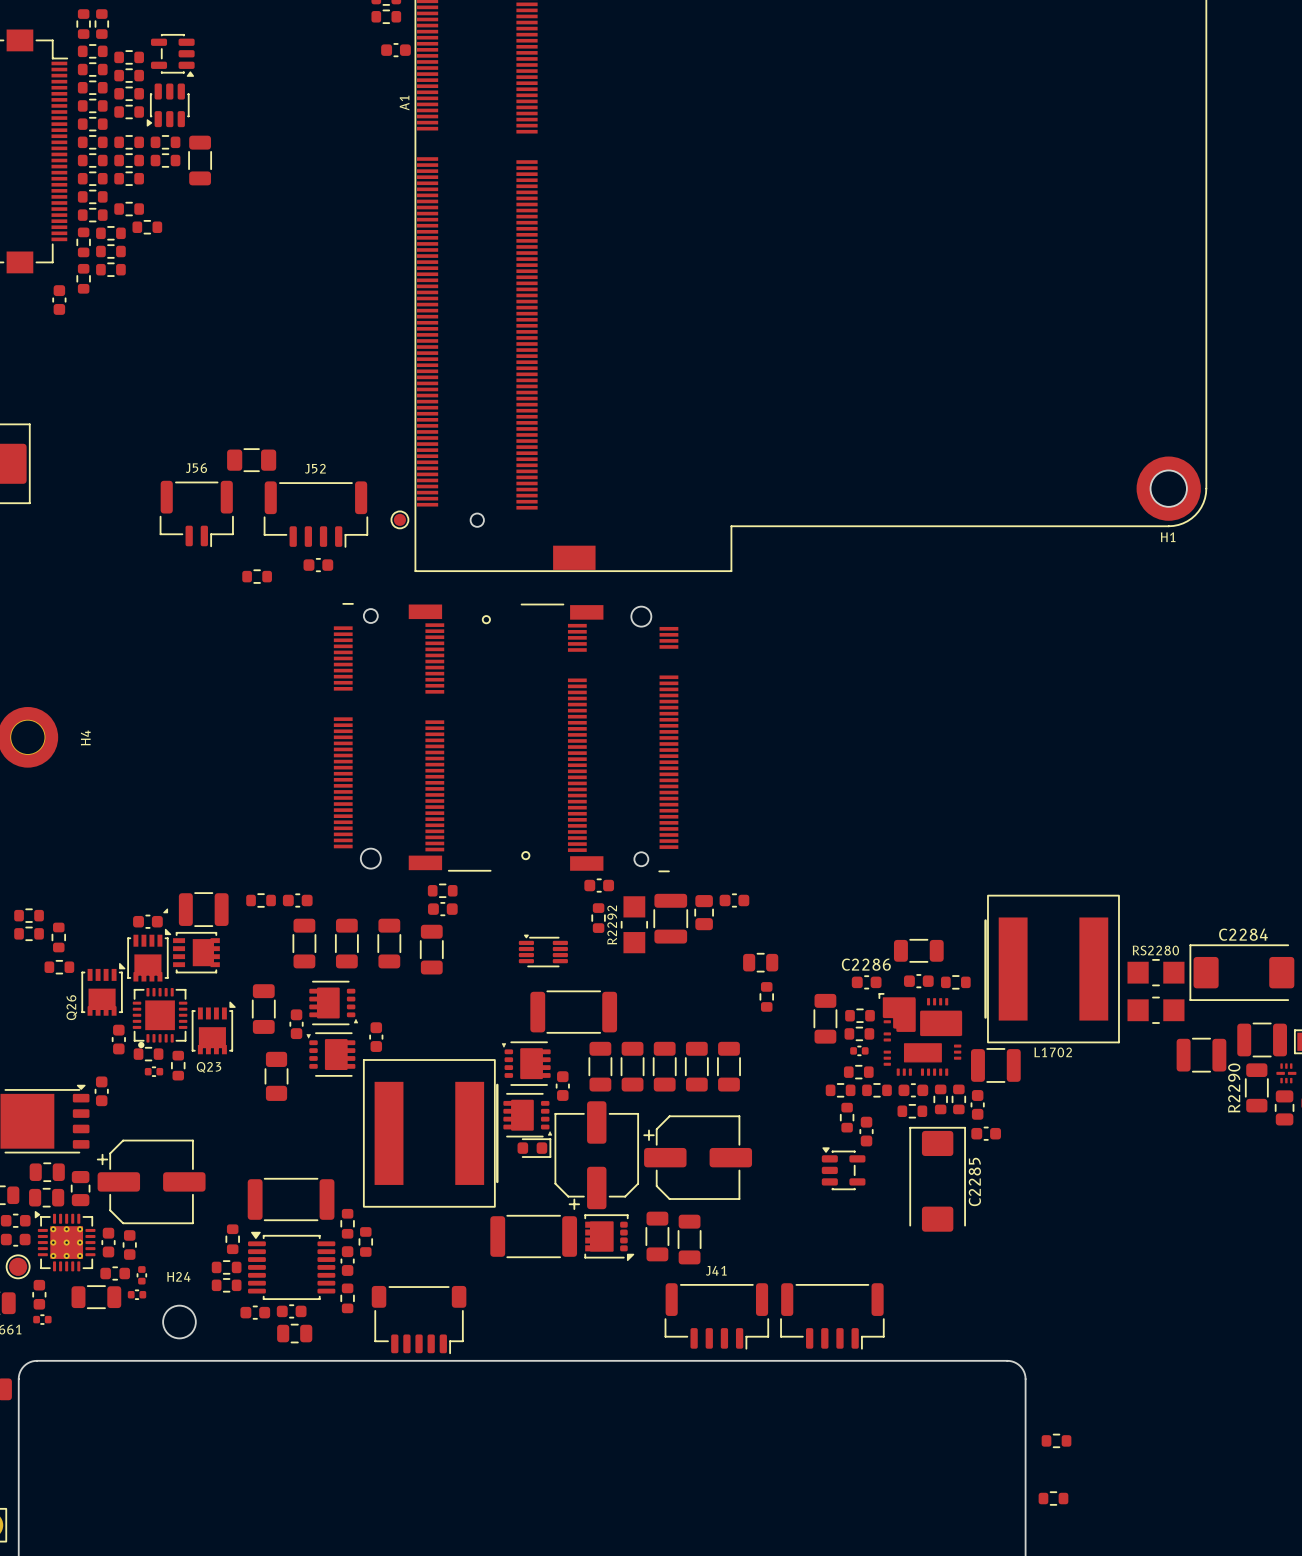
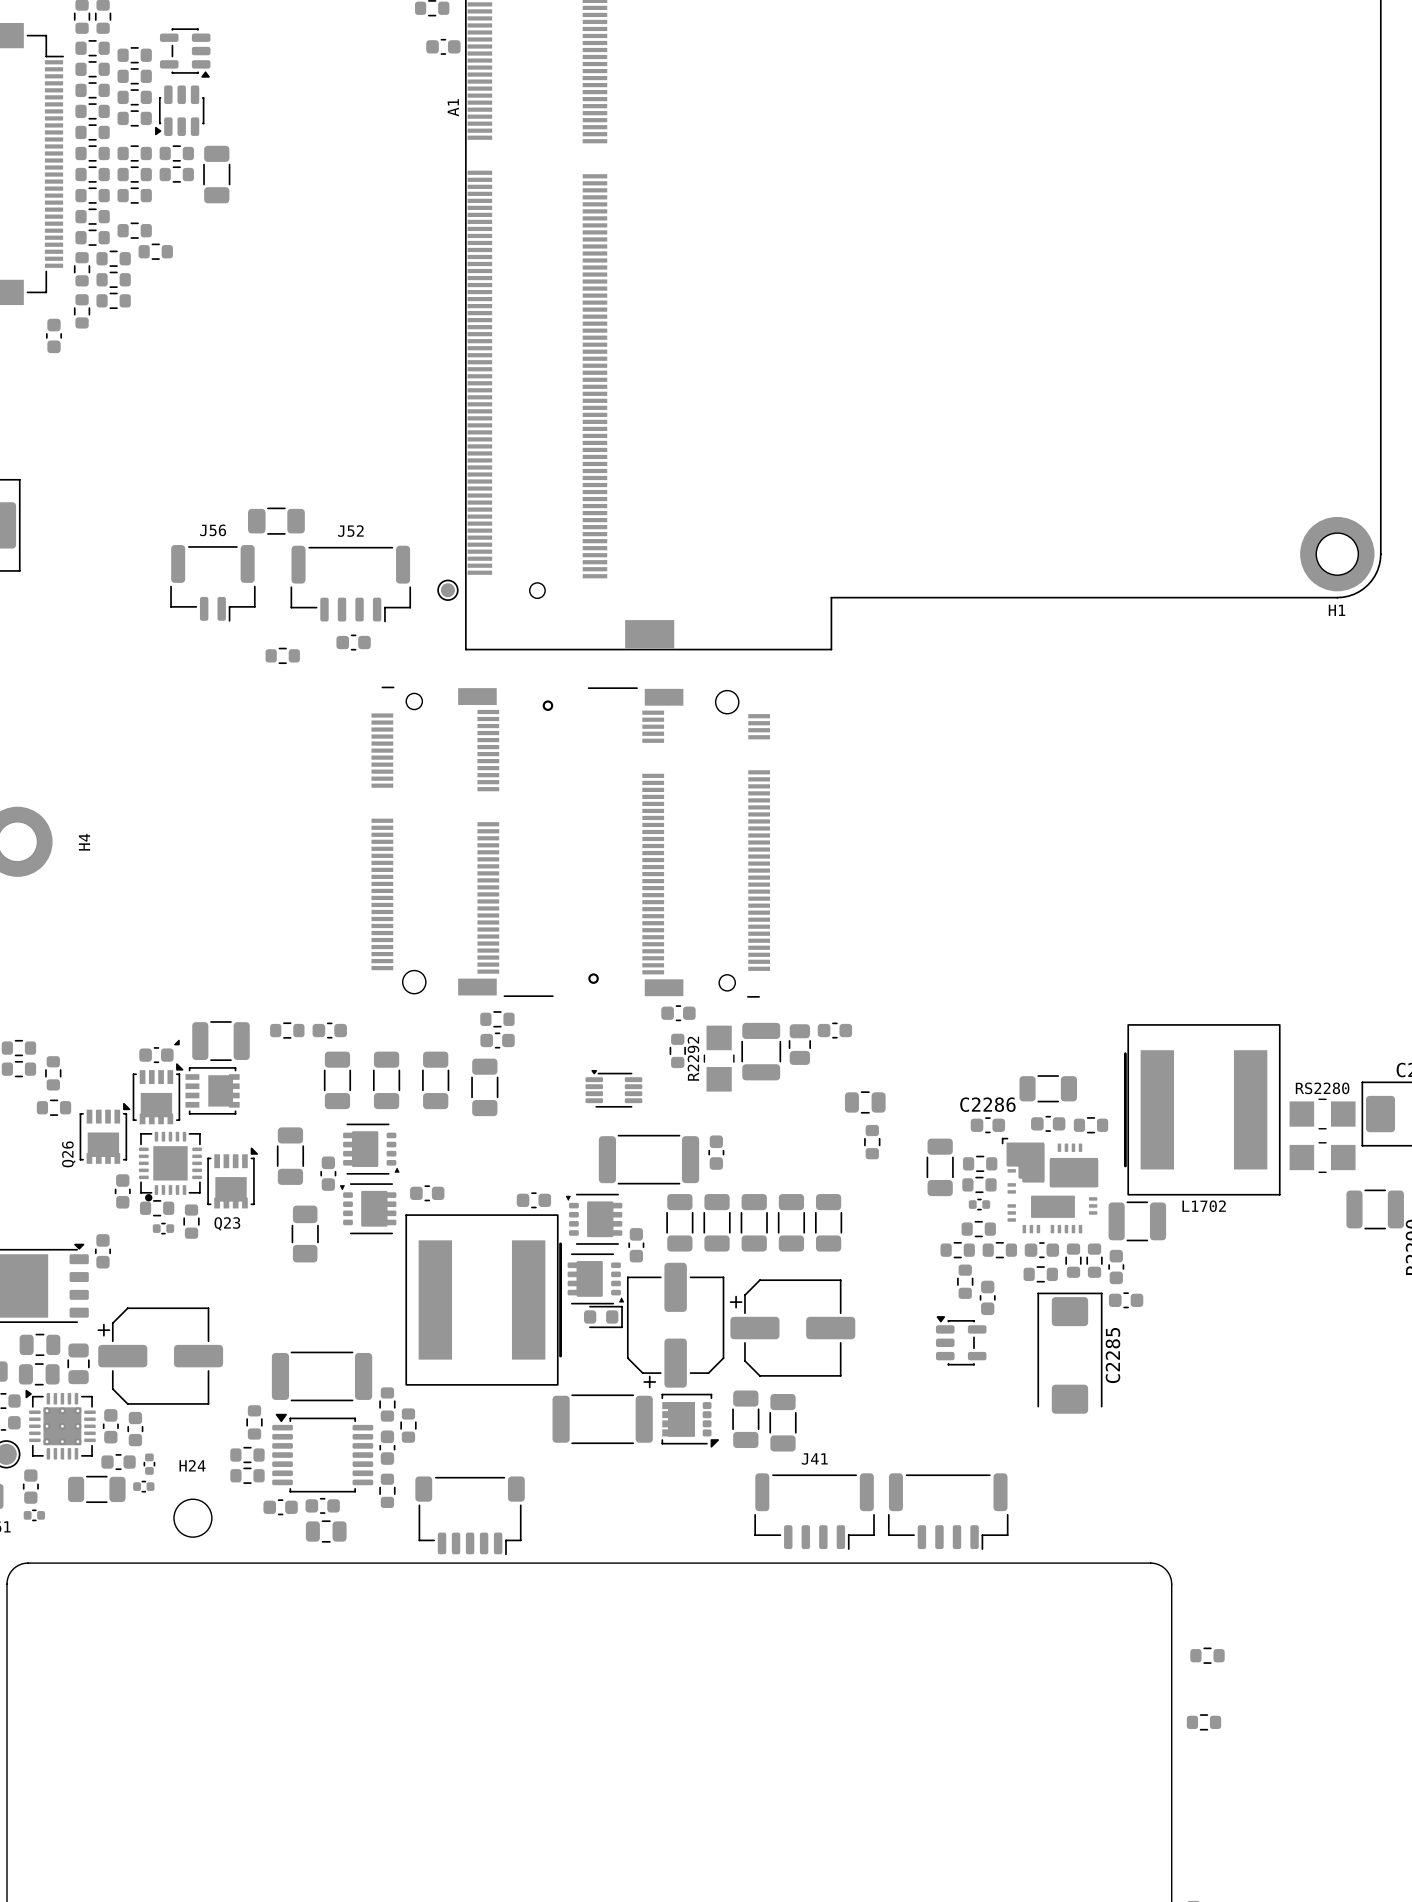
part: none -> (716, 1152)
part rotation: 0° (376, 1037) -> 90° clockwise (427, 1193)
part: none -> (533, 1200)

